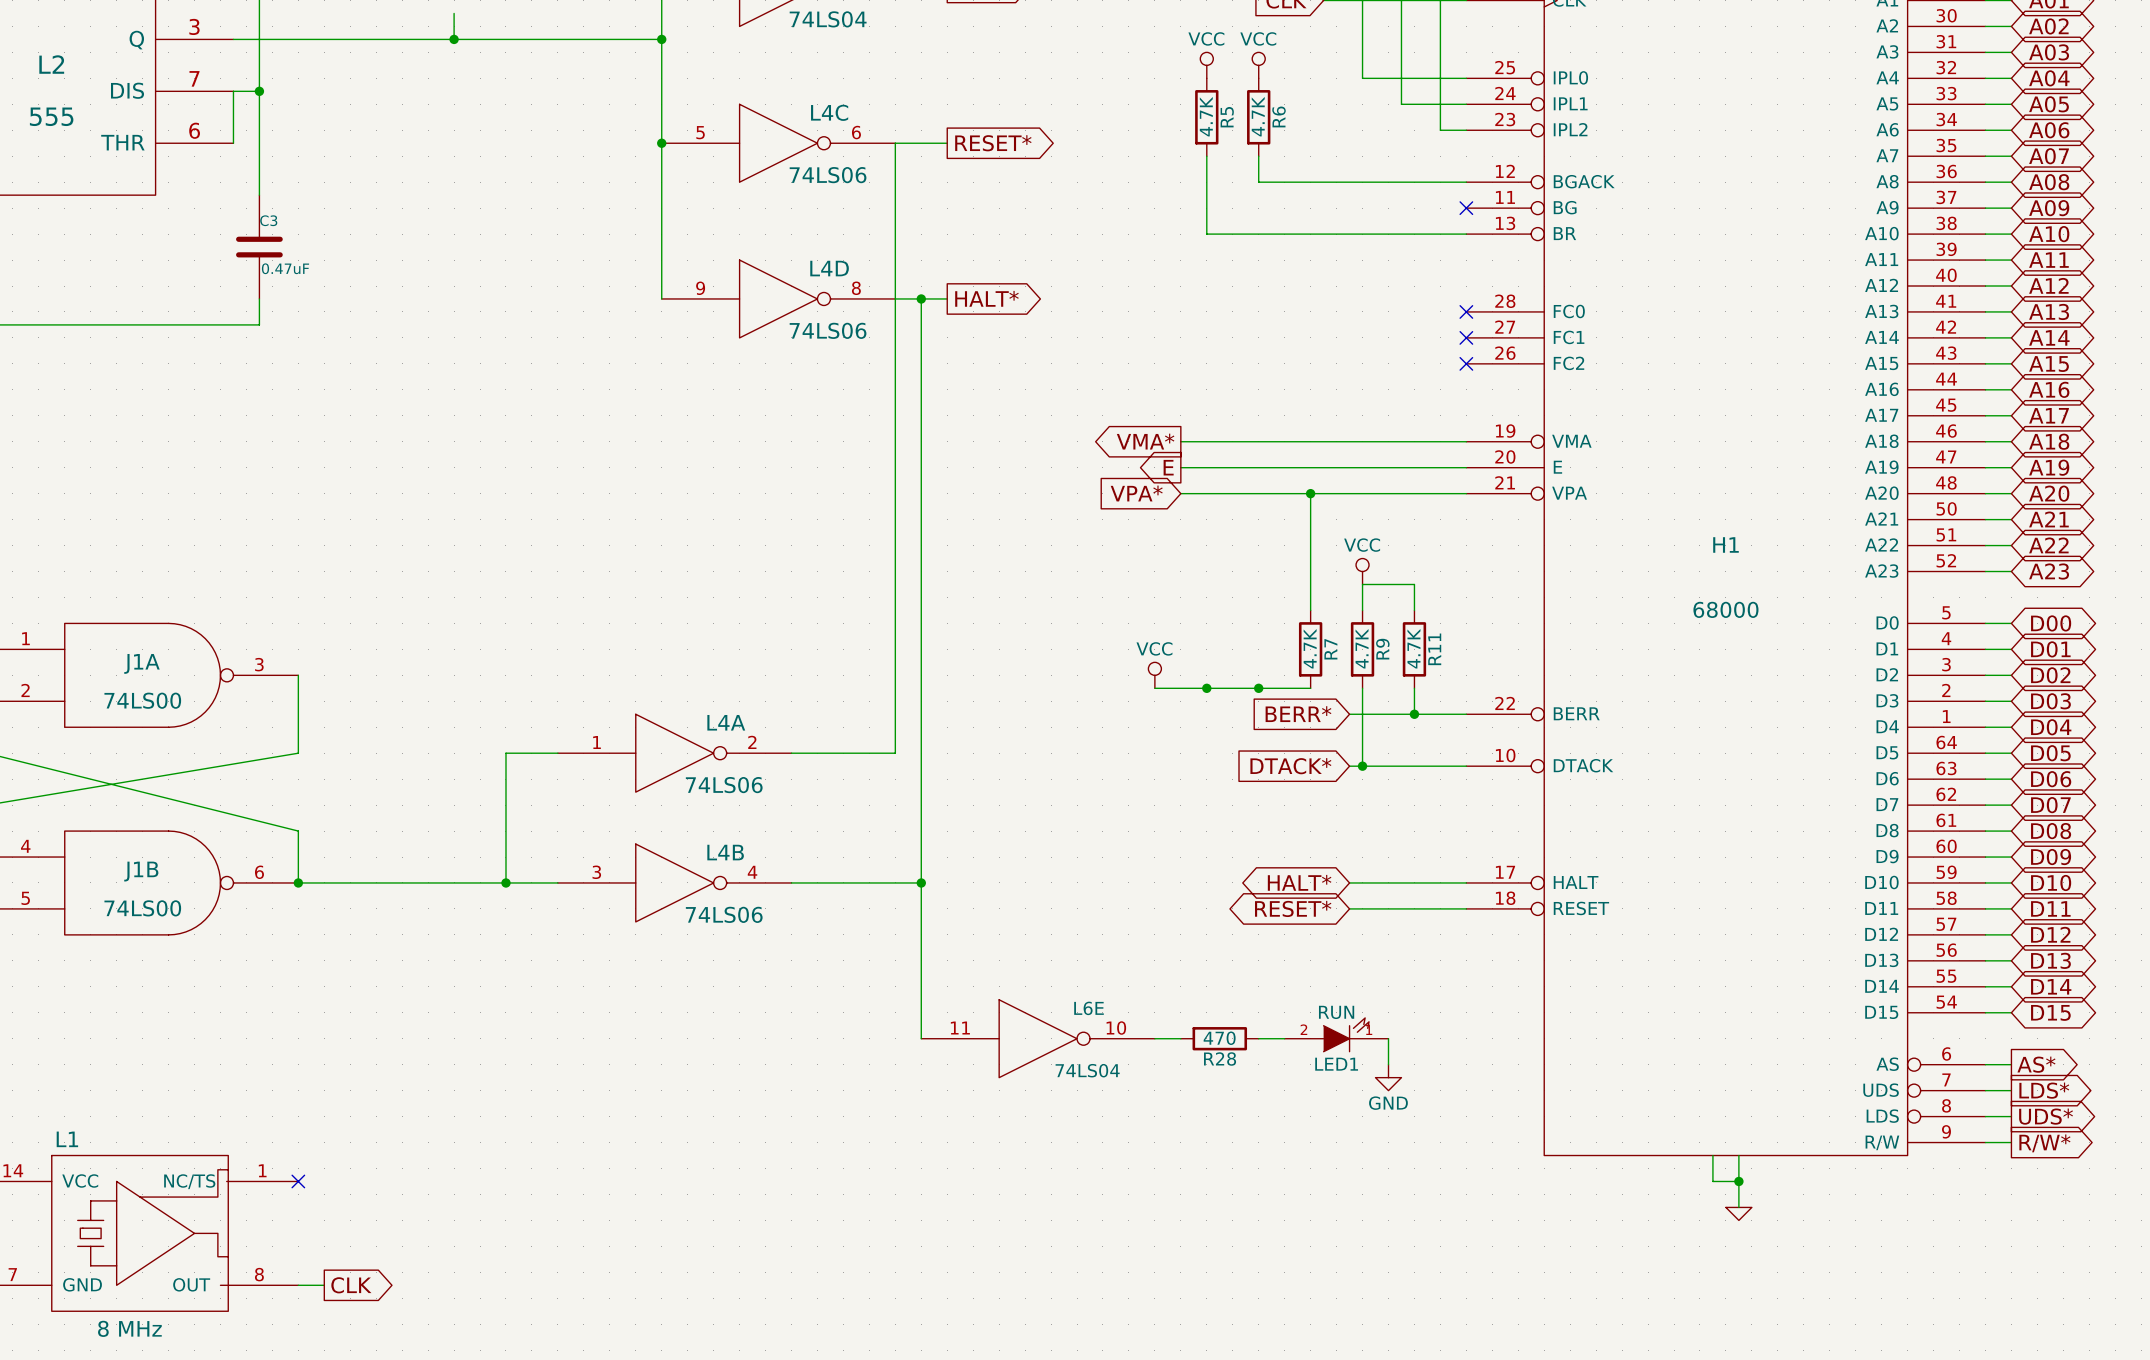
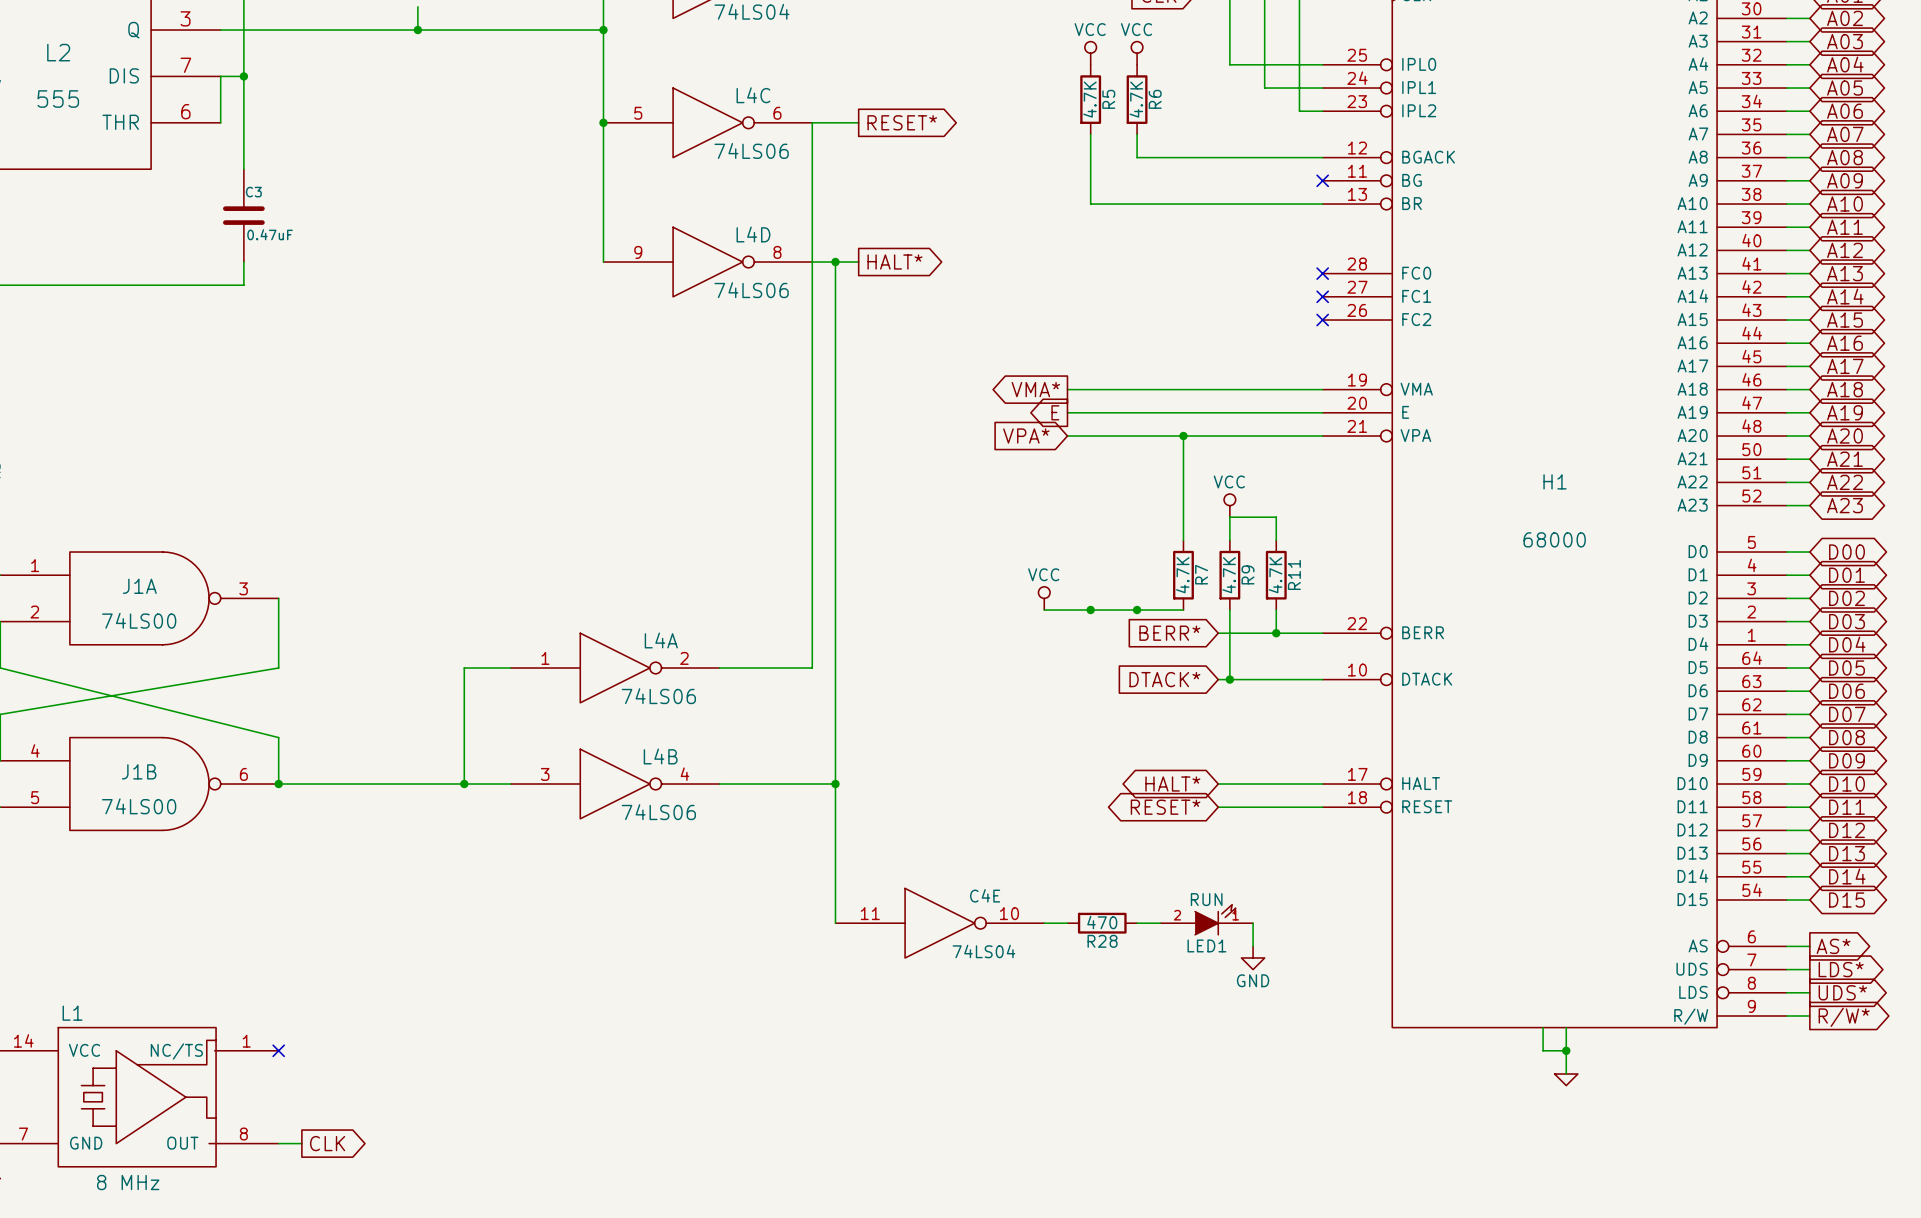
L6E name: L6E (1089, 1008) -> C4E (985, 895)

